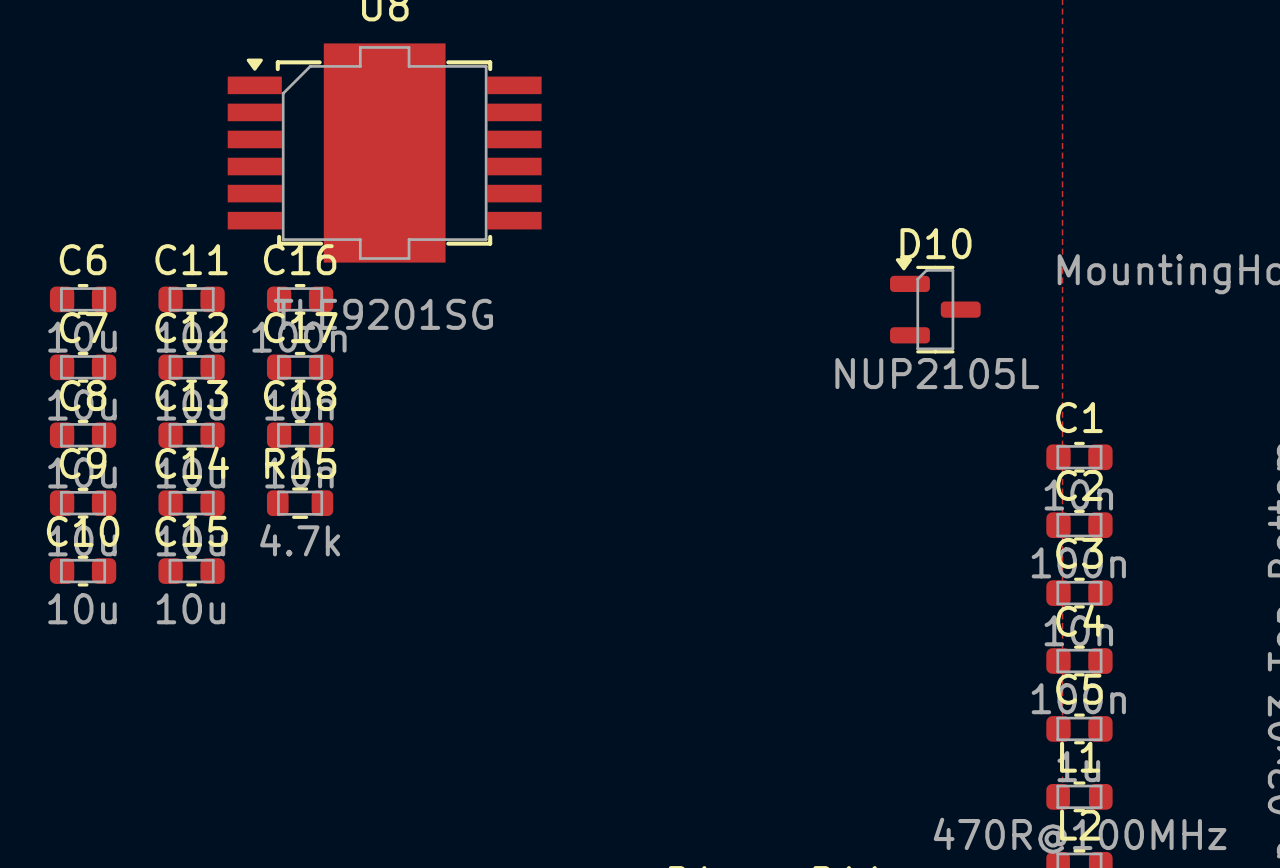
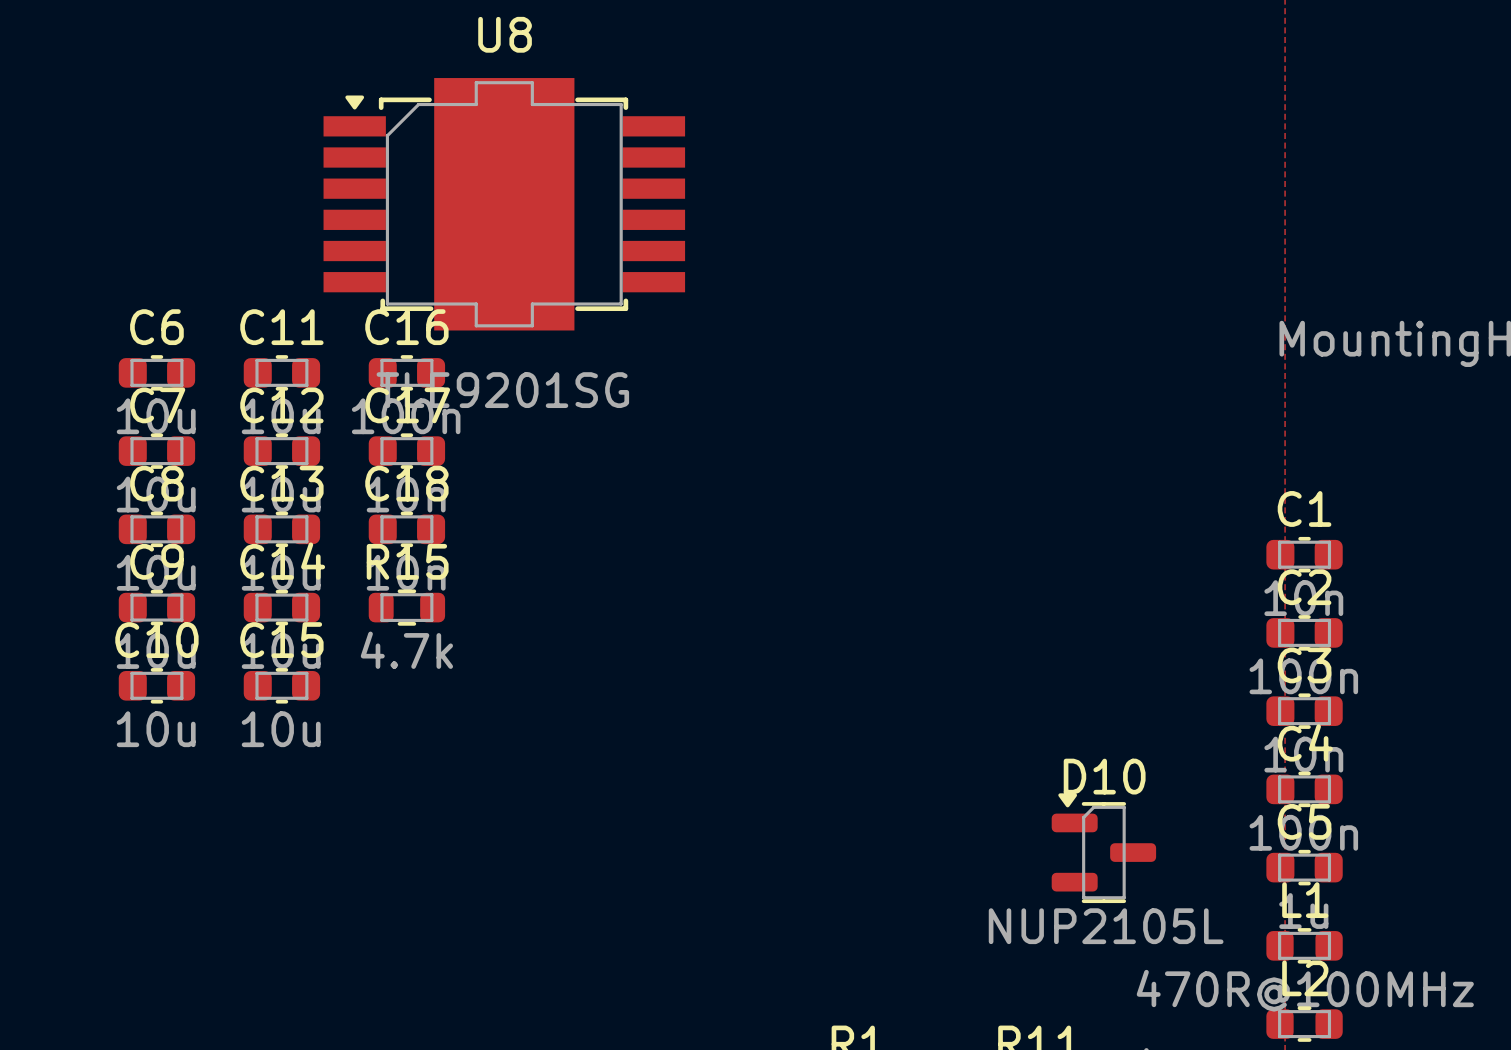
D10 position: (935, 305) -> (1103, 848)

